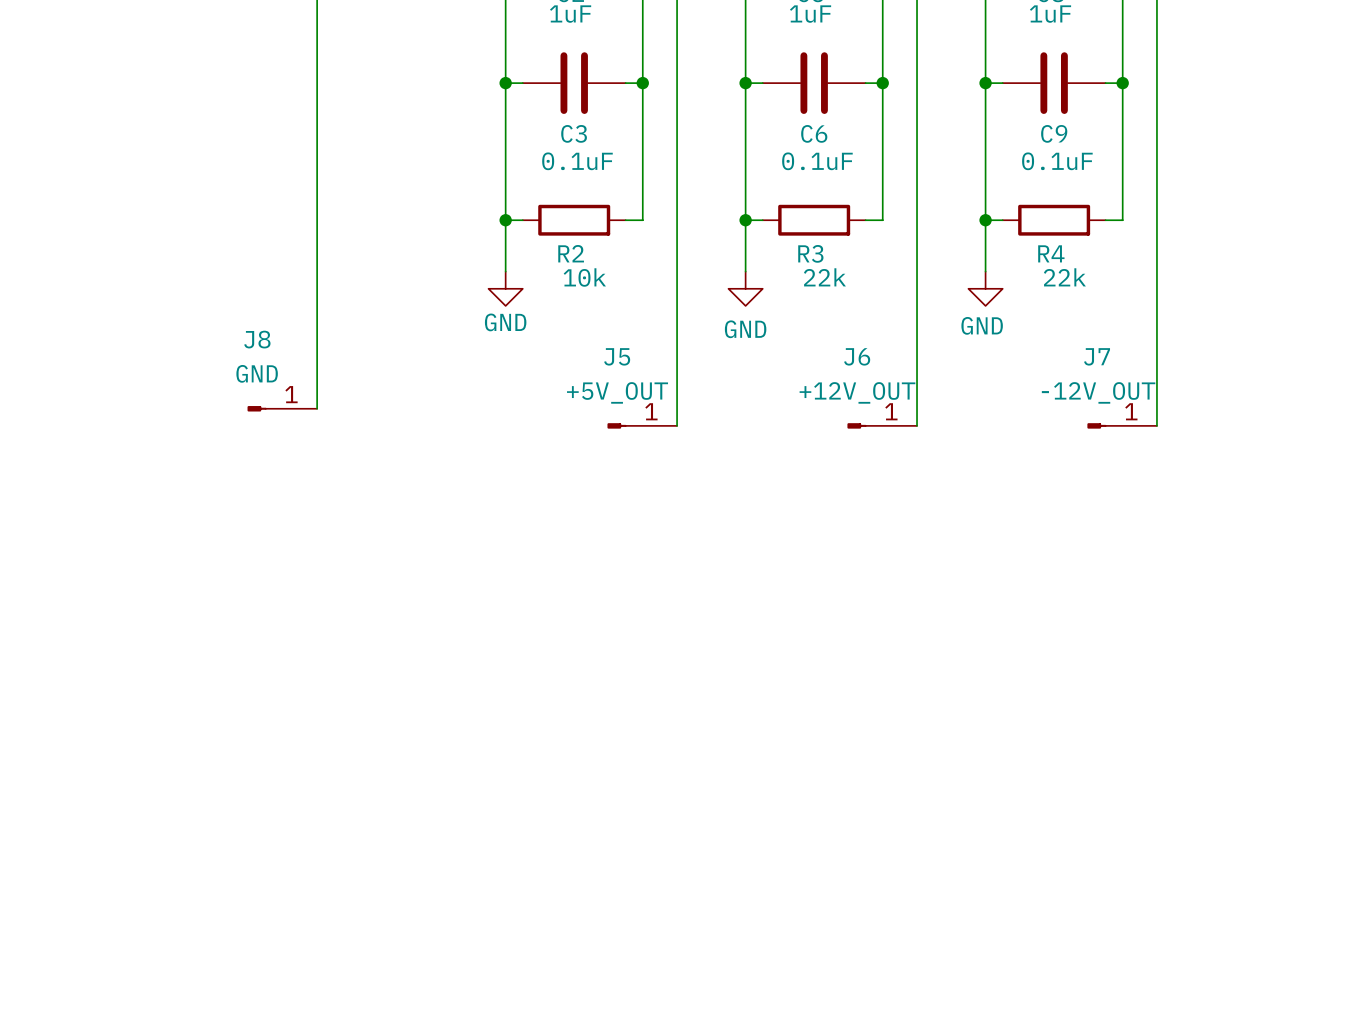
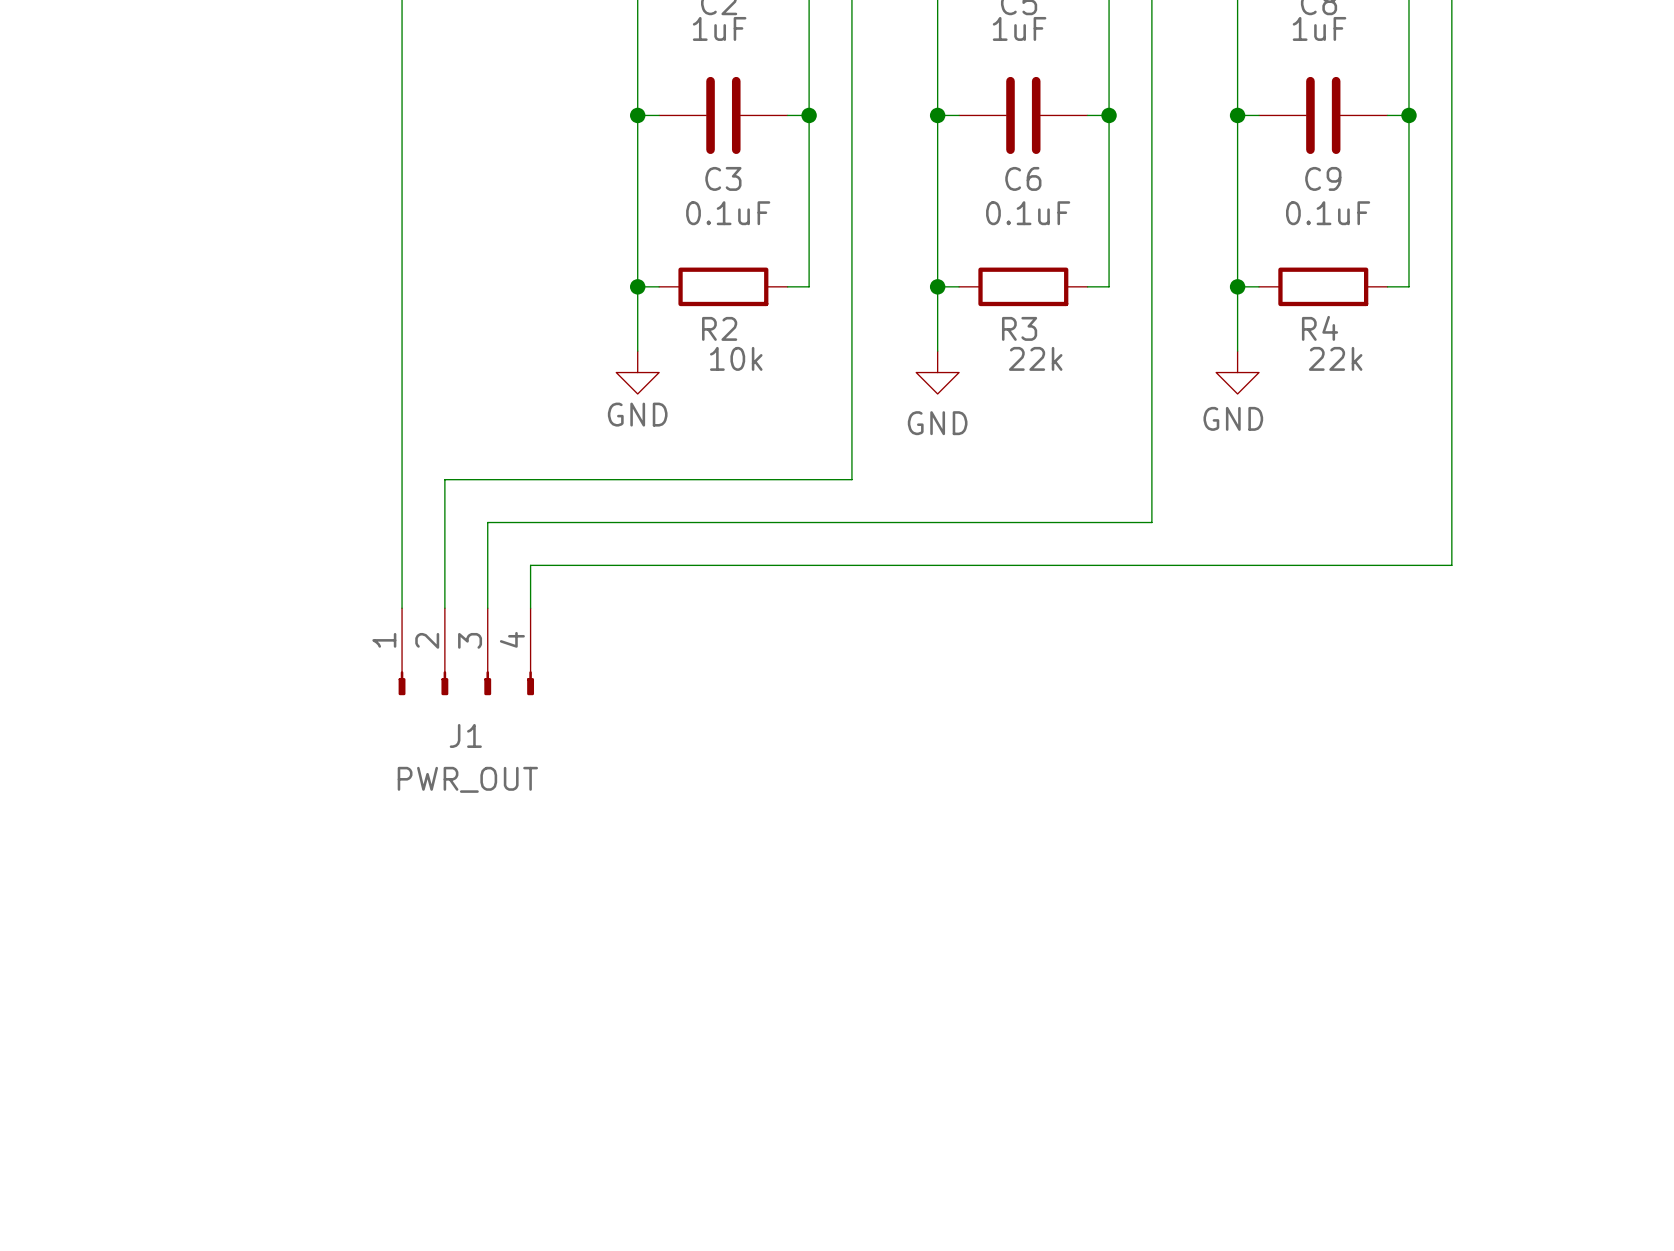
wire: (677, 374) (677, 425) -> (851, 479) (444, 479) (444, 608)
J8: GND (282, 408) -> none
wire: none -> (402, 522) (402, 608)
wire: (917, 408) (917, 425) -> (1151, 522) (487, 522) (487, 608)
J5: +5V_OUT (642, 425) -> none
J6: +12V_OUT (882, 425) -> none
J7: -12V_OUT (1122, 425) -> none
wire: none -> (1451, 543) (1451, 565) (530, 565) (530, 608)
J1: none -> PWR_OUT (466, 651)

